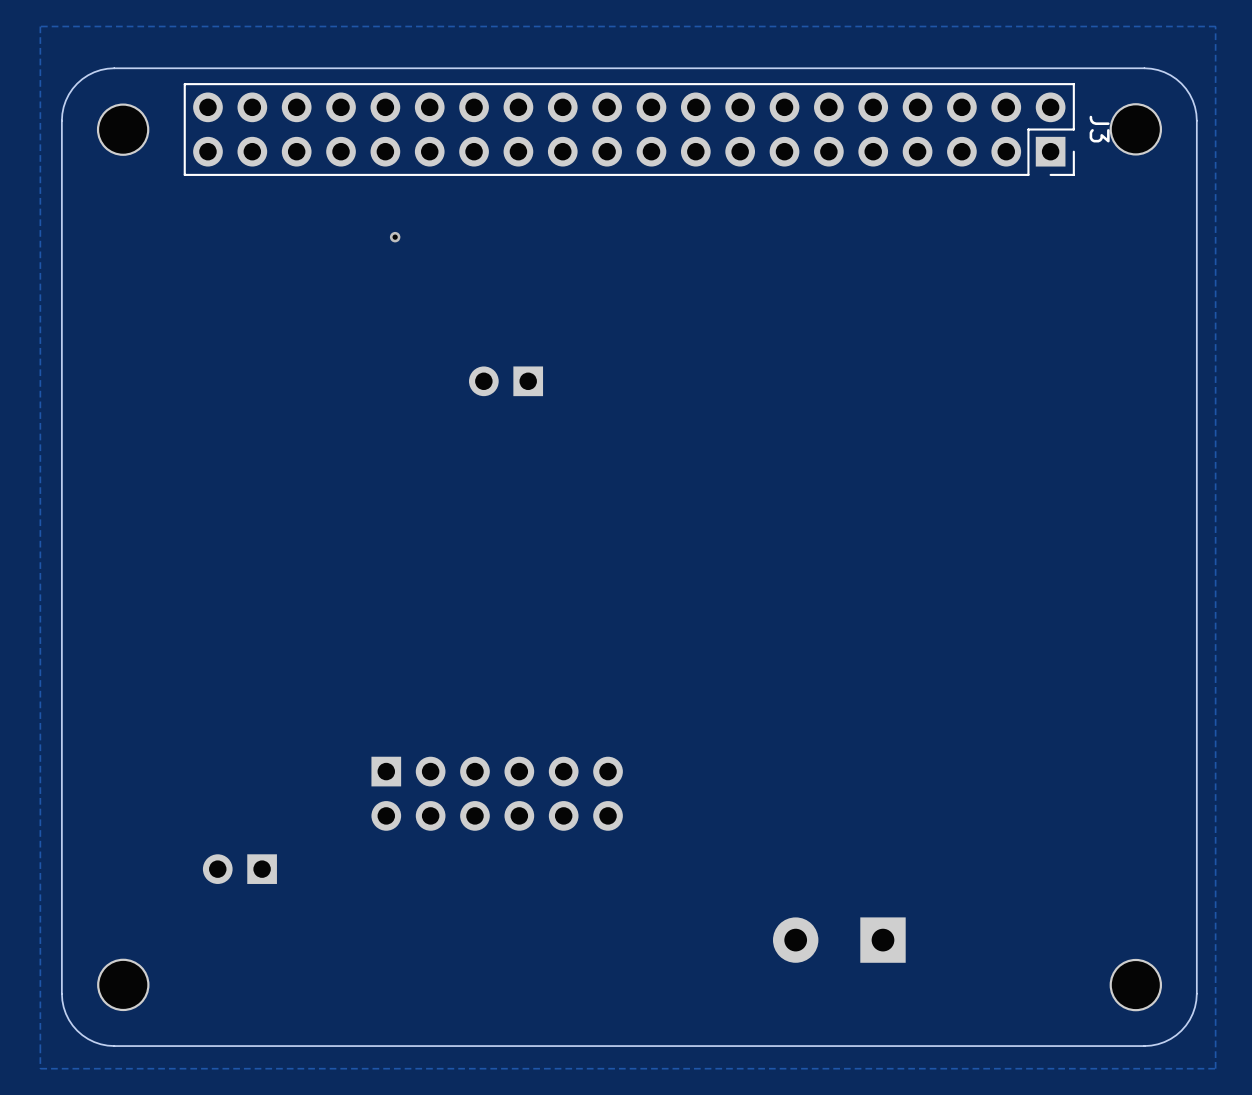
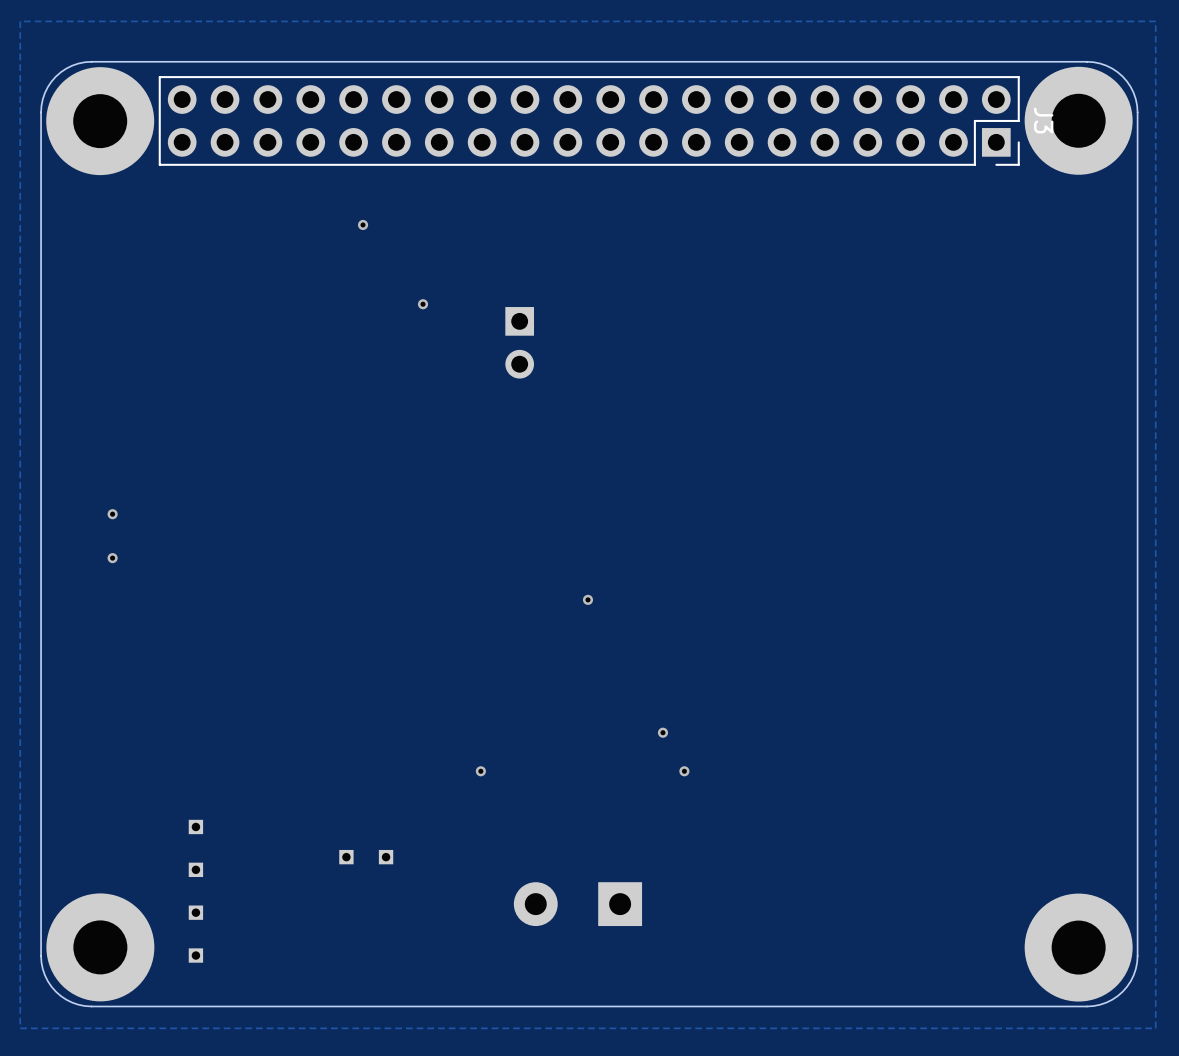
part footprint: [96, 103, 150, 156] -> [46, 67, 155, 176]
part footprint: [1109, 103, 1163, 156] -> [1024, 66, 1133, 175]
via: none -> (423, 304)
part rotation: 0° (506, 381) -> 90° counterclockwise (519, 342)
part position: (506, 381) -> (519, 342)
via: none -> (112, 514)
via: none -> (112, 558)
via: none -> (587, 599)
via: none -> (662, 732)
part: (497, 793) -> none
via: none -> (480, 771)
via: none -> (684, 771)
part: none -> (195, 826)
part: (239, 869) -> none
part: none -> (346, 857)
part: none -> (386, 857)
part: none -> (195, 869)
part position: (839, 940) -> (577, 904)
part: none -> (195, 912)
part footprint: [97, 958, 150, 1012] -> [46, 893, 155, 1002]
part footprint: [1109, 958, 1163, 1012] -> [1024, 893, 1133, 1002]
part: none -> (195, 955)

